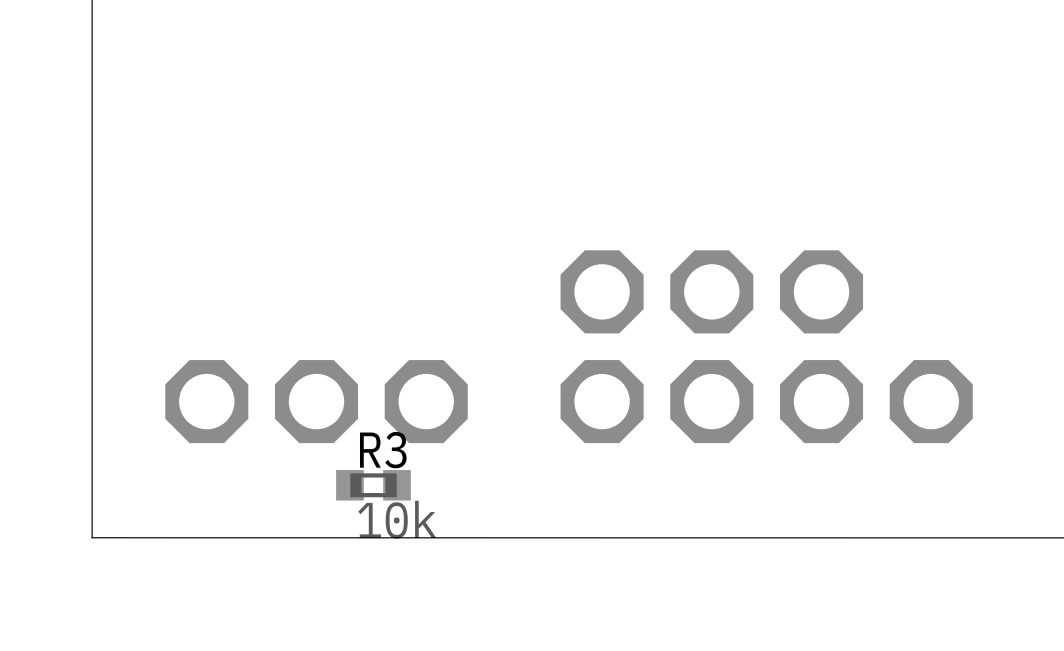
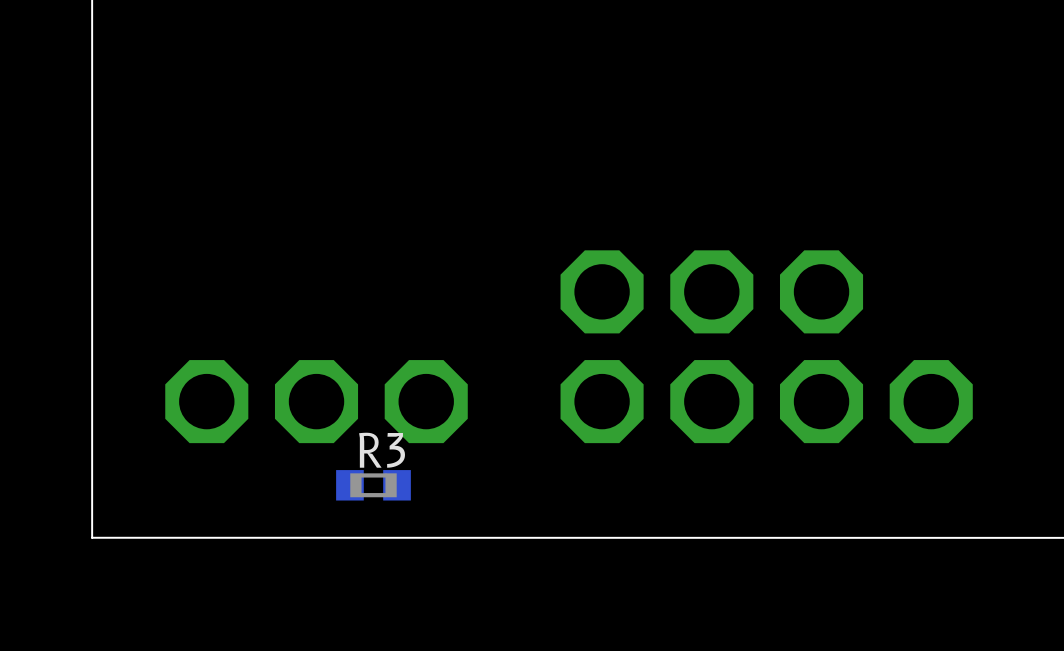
R3 value: 10k (397, 519) -> none

